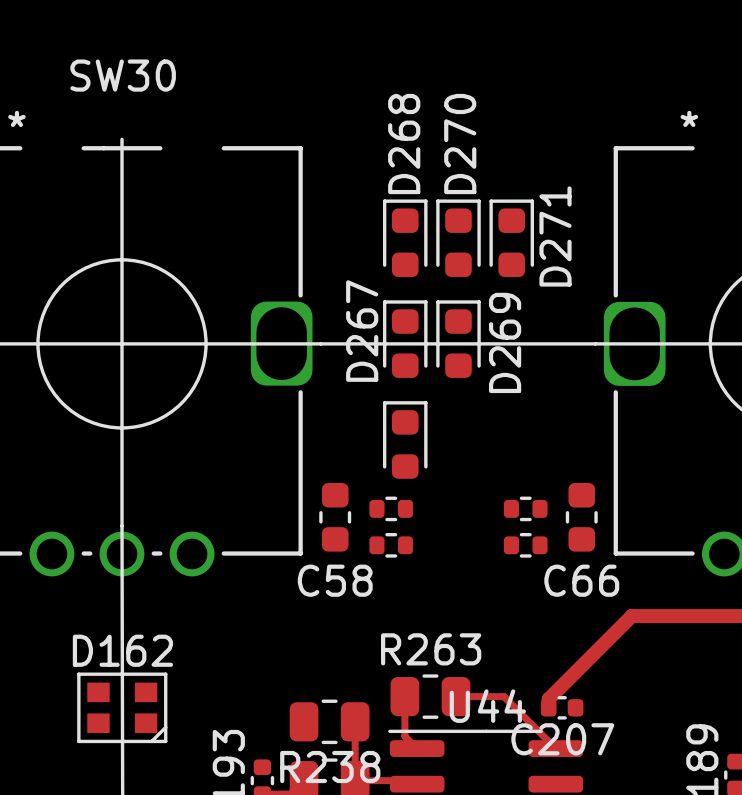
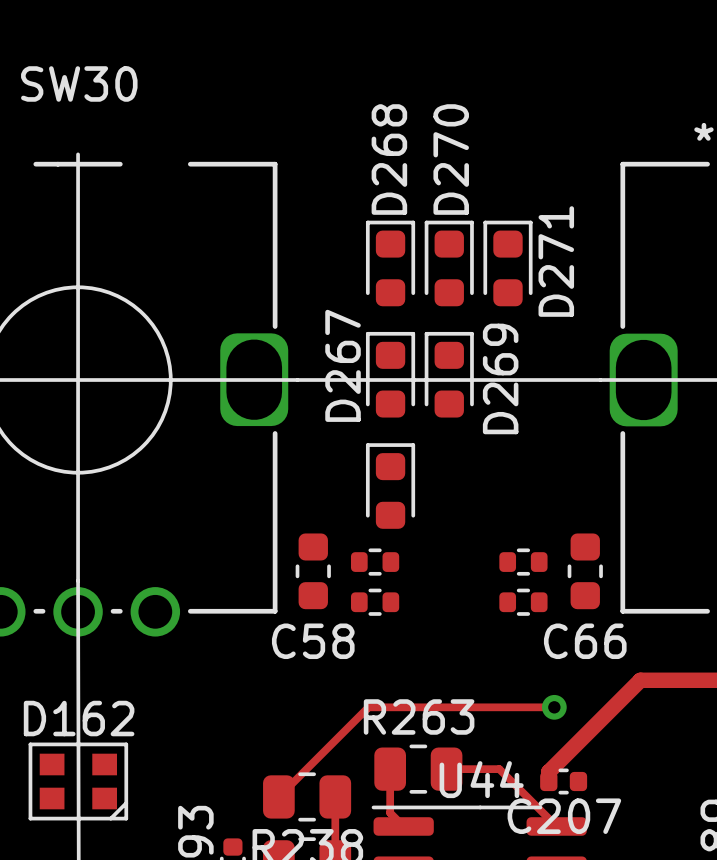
track: none -> (554, 707) (368, 707) (278, 796)
via: none -> (554, 707)

